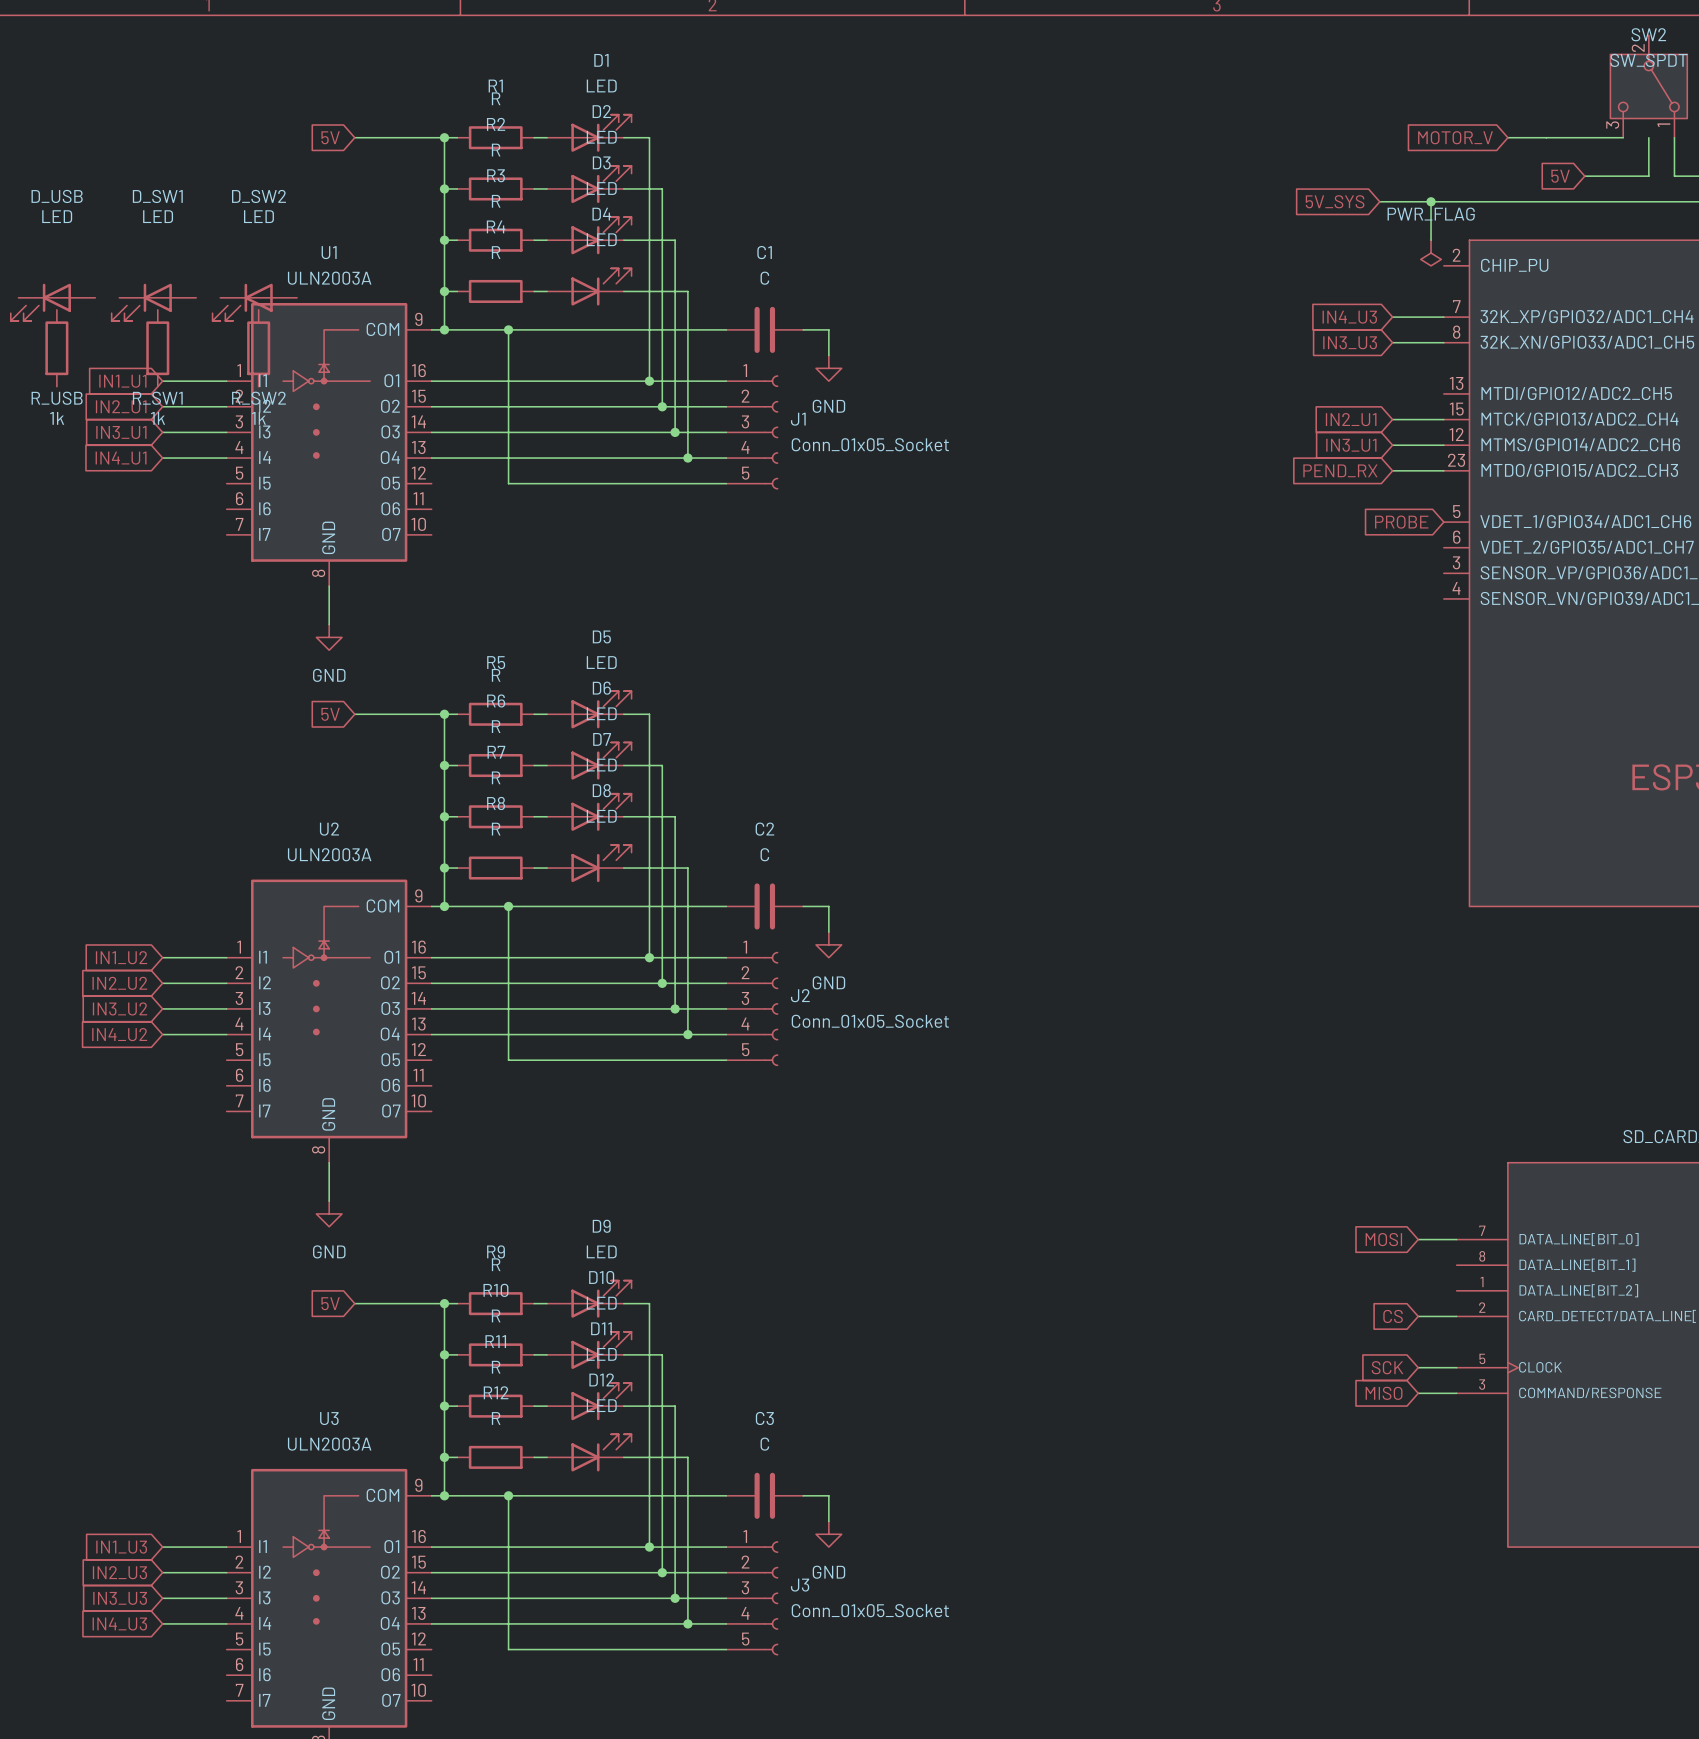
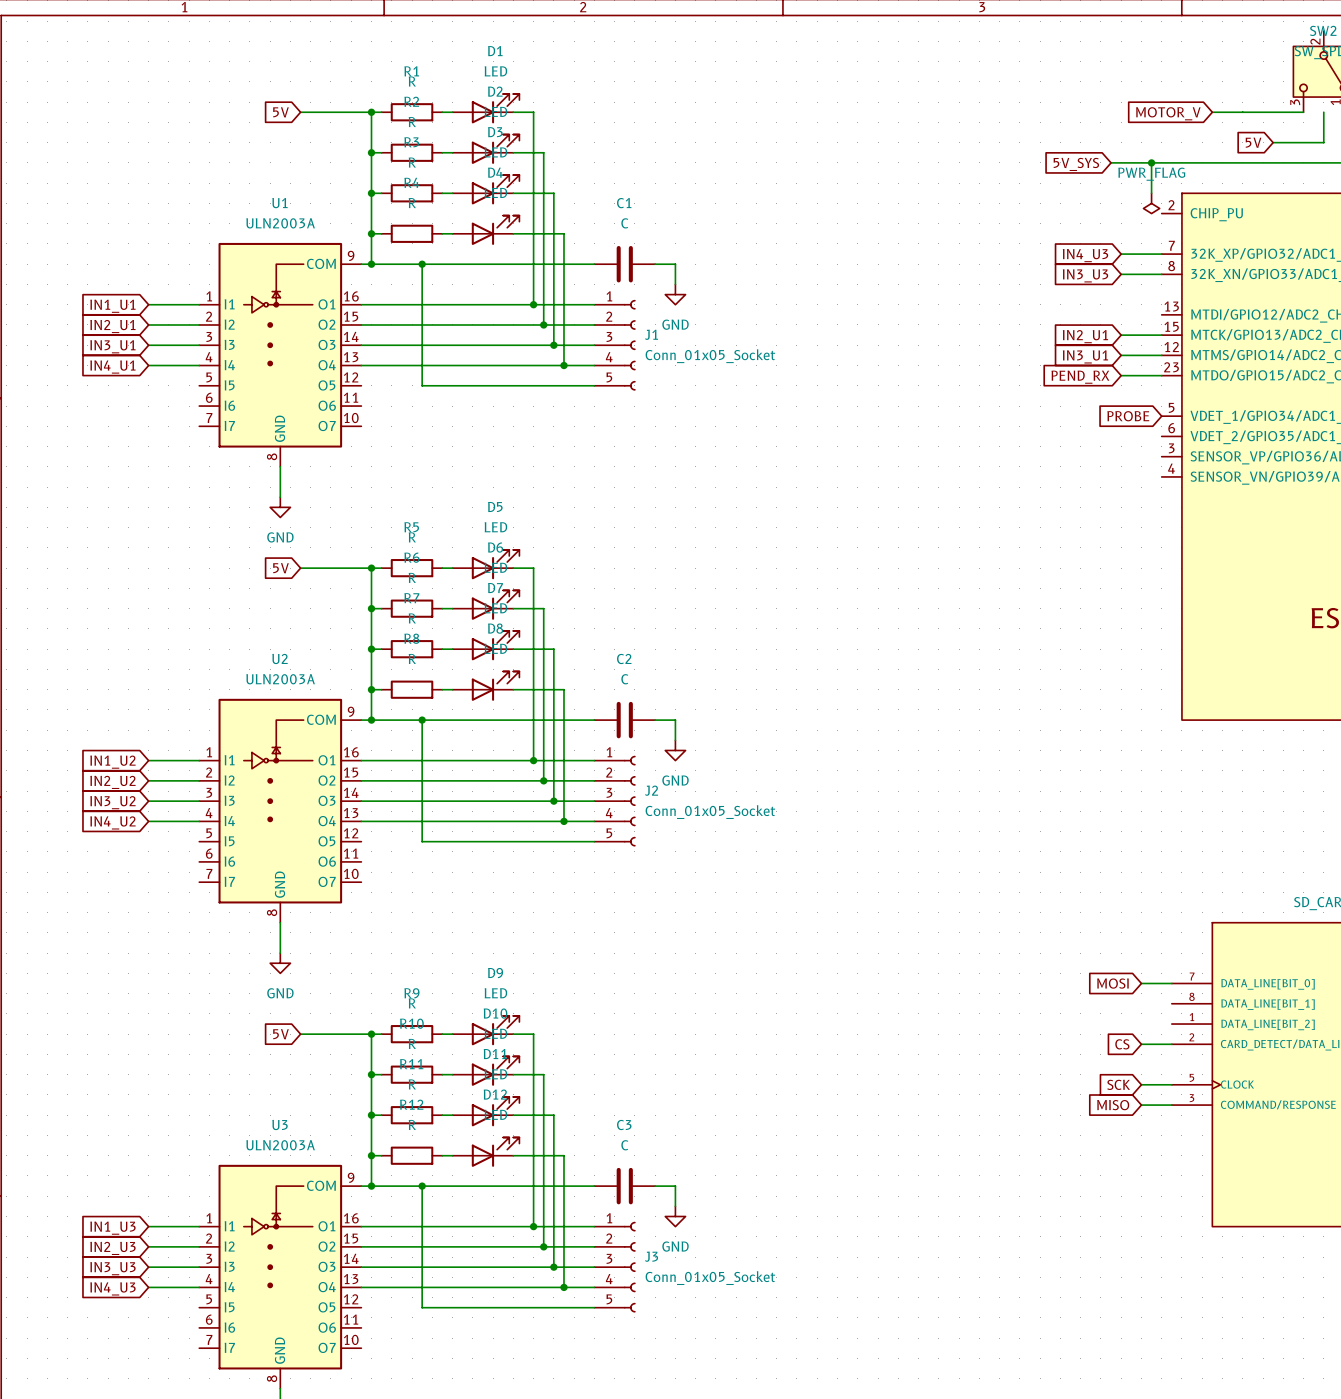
D_USB: LED (53, 302) -> none
D_SW1: LED (153, 302) -> none
D_SW2: LED (254, 302) -> none
R_USB: 1k (56, 348) -> none
R_SW1: 1k (157, 348) -> none
R_SW2: 1k (258, 348) -> none

